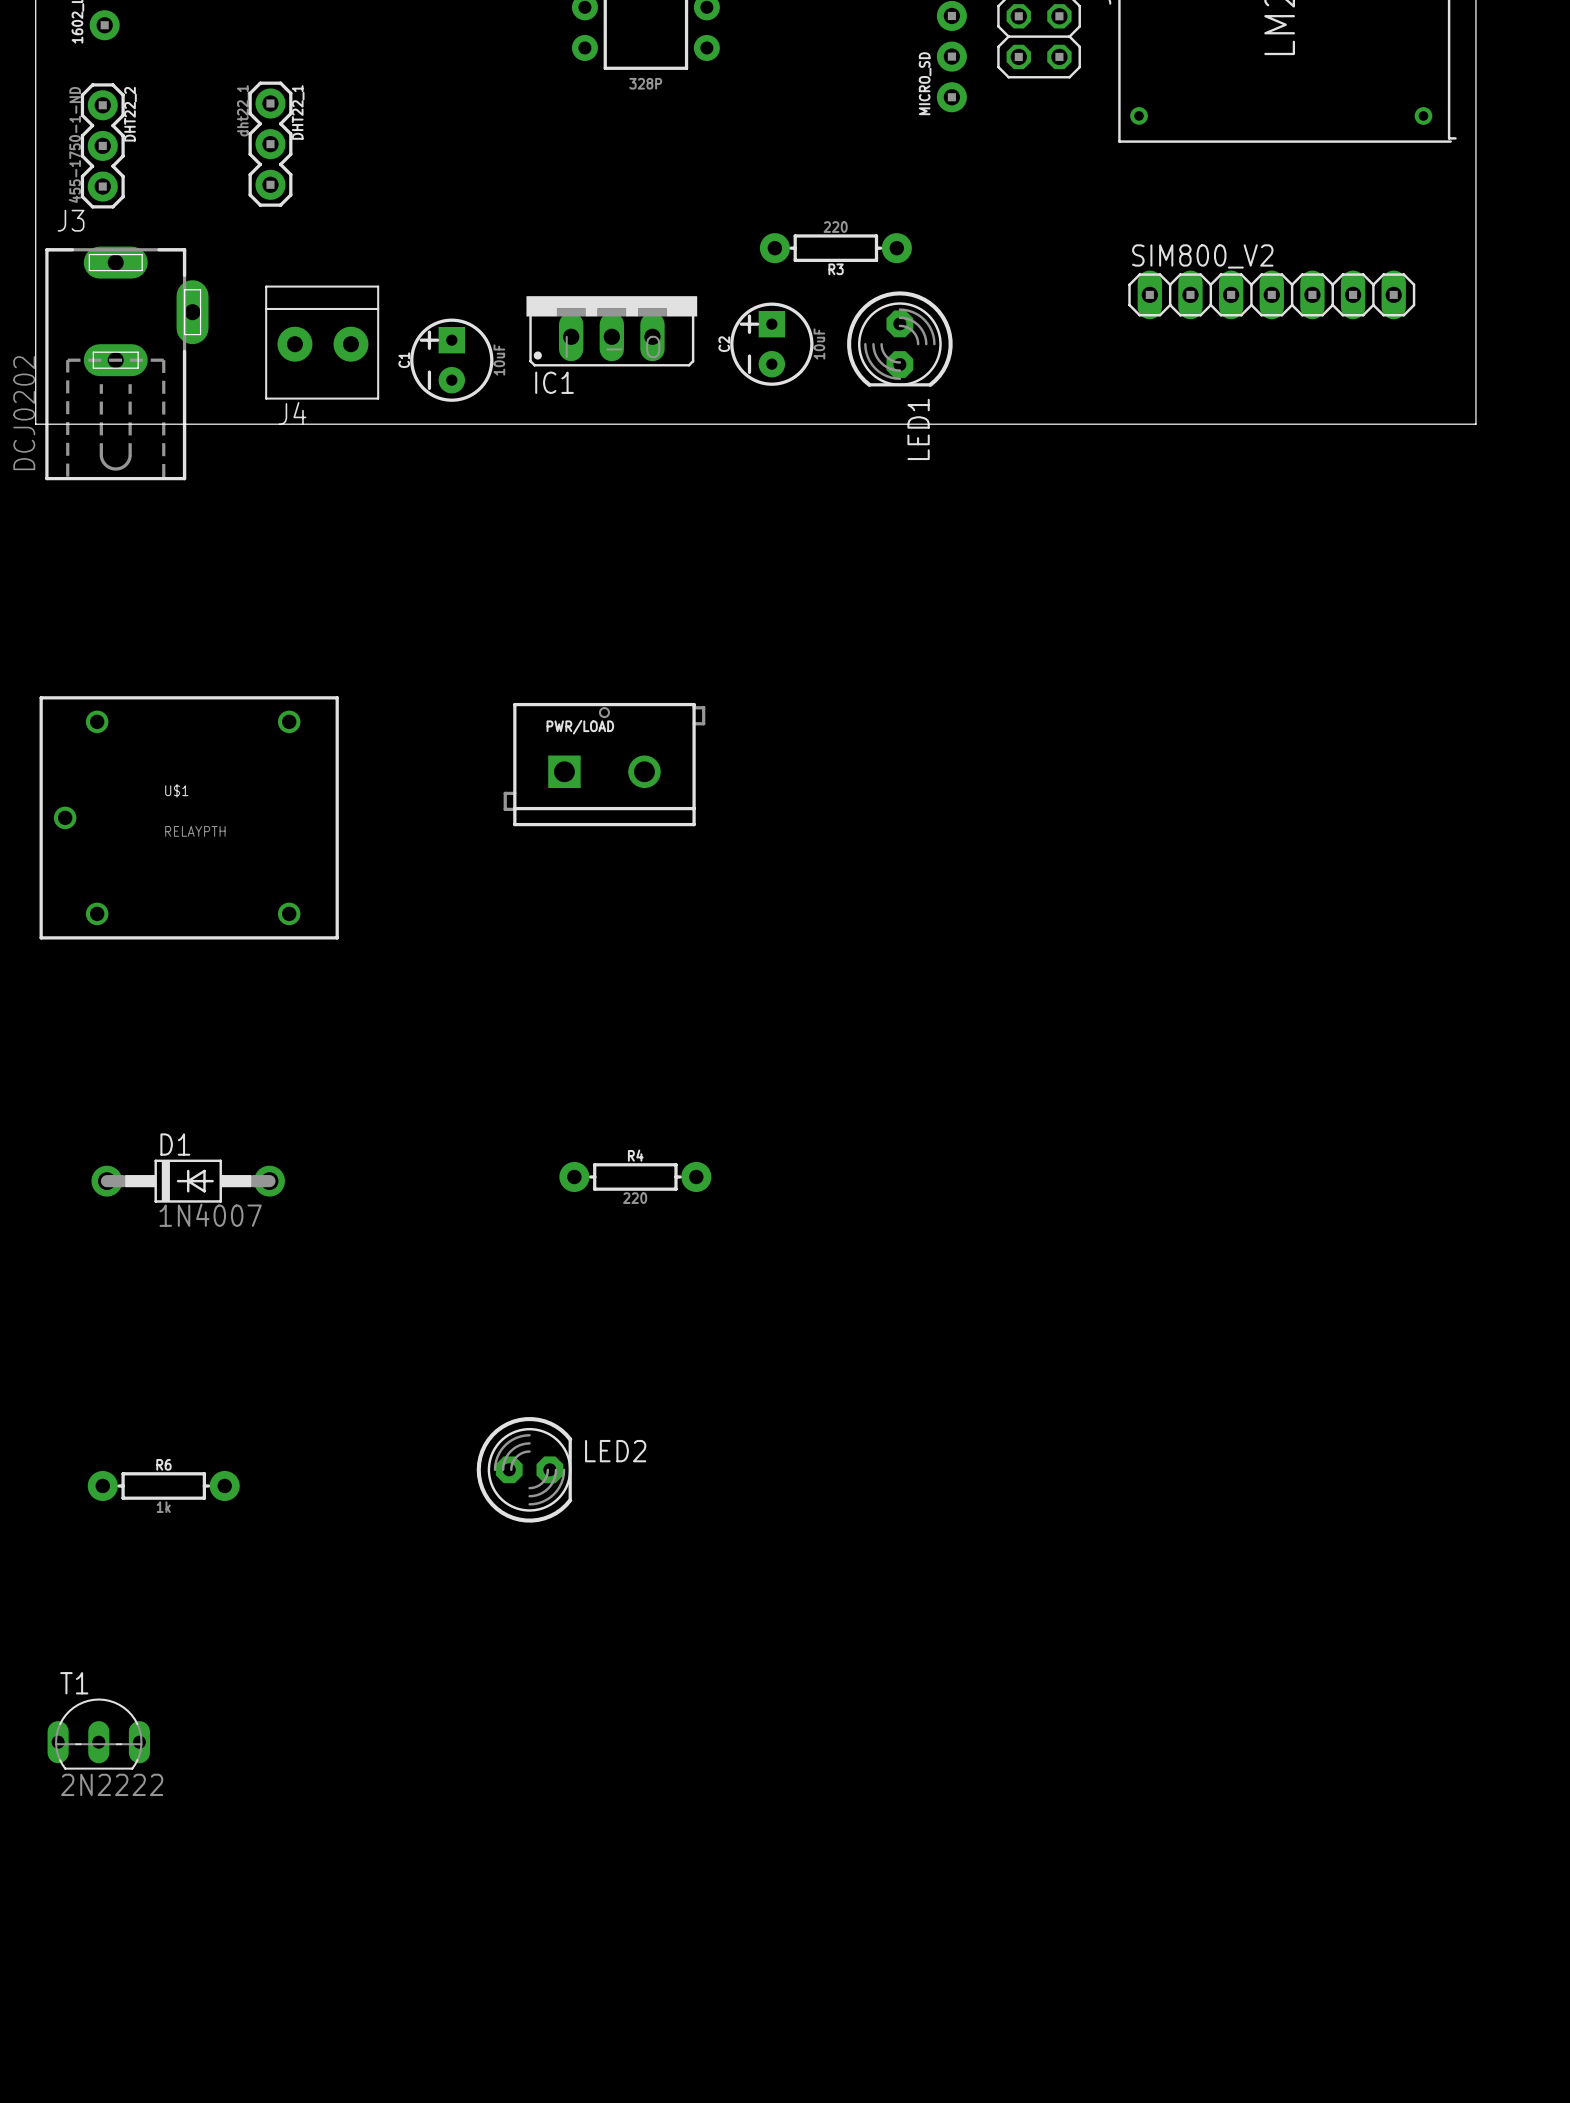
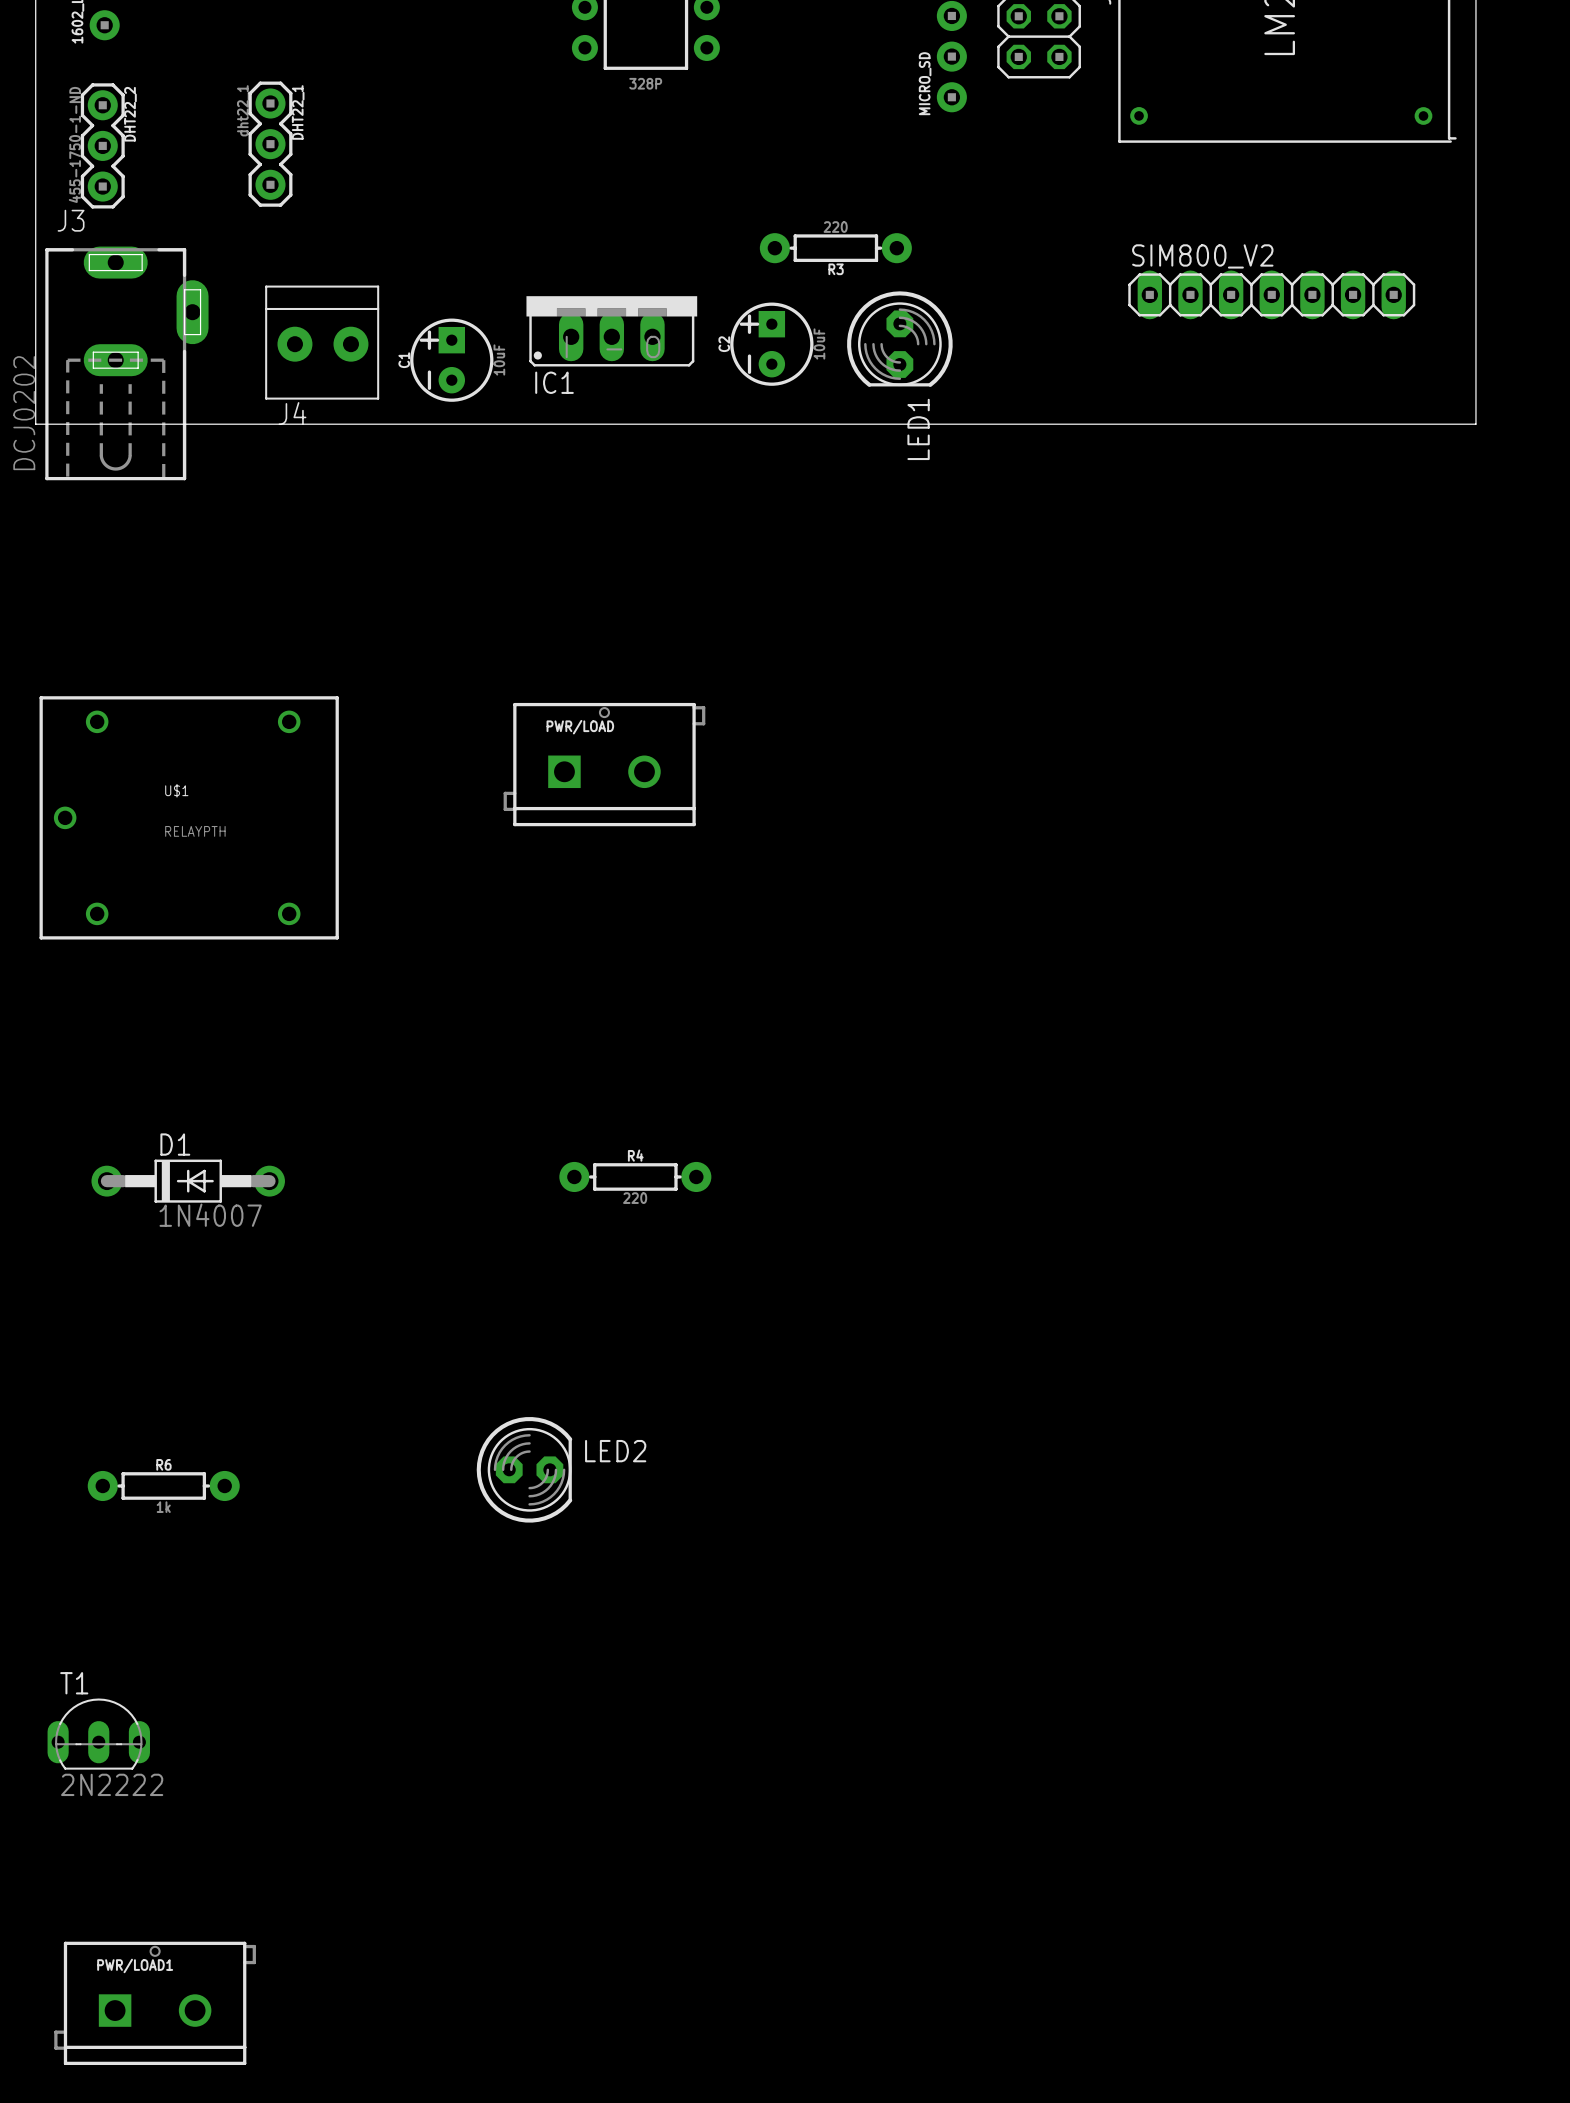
PWR/LOAD1: none -> (155, 2003)

